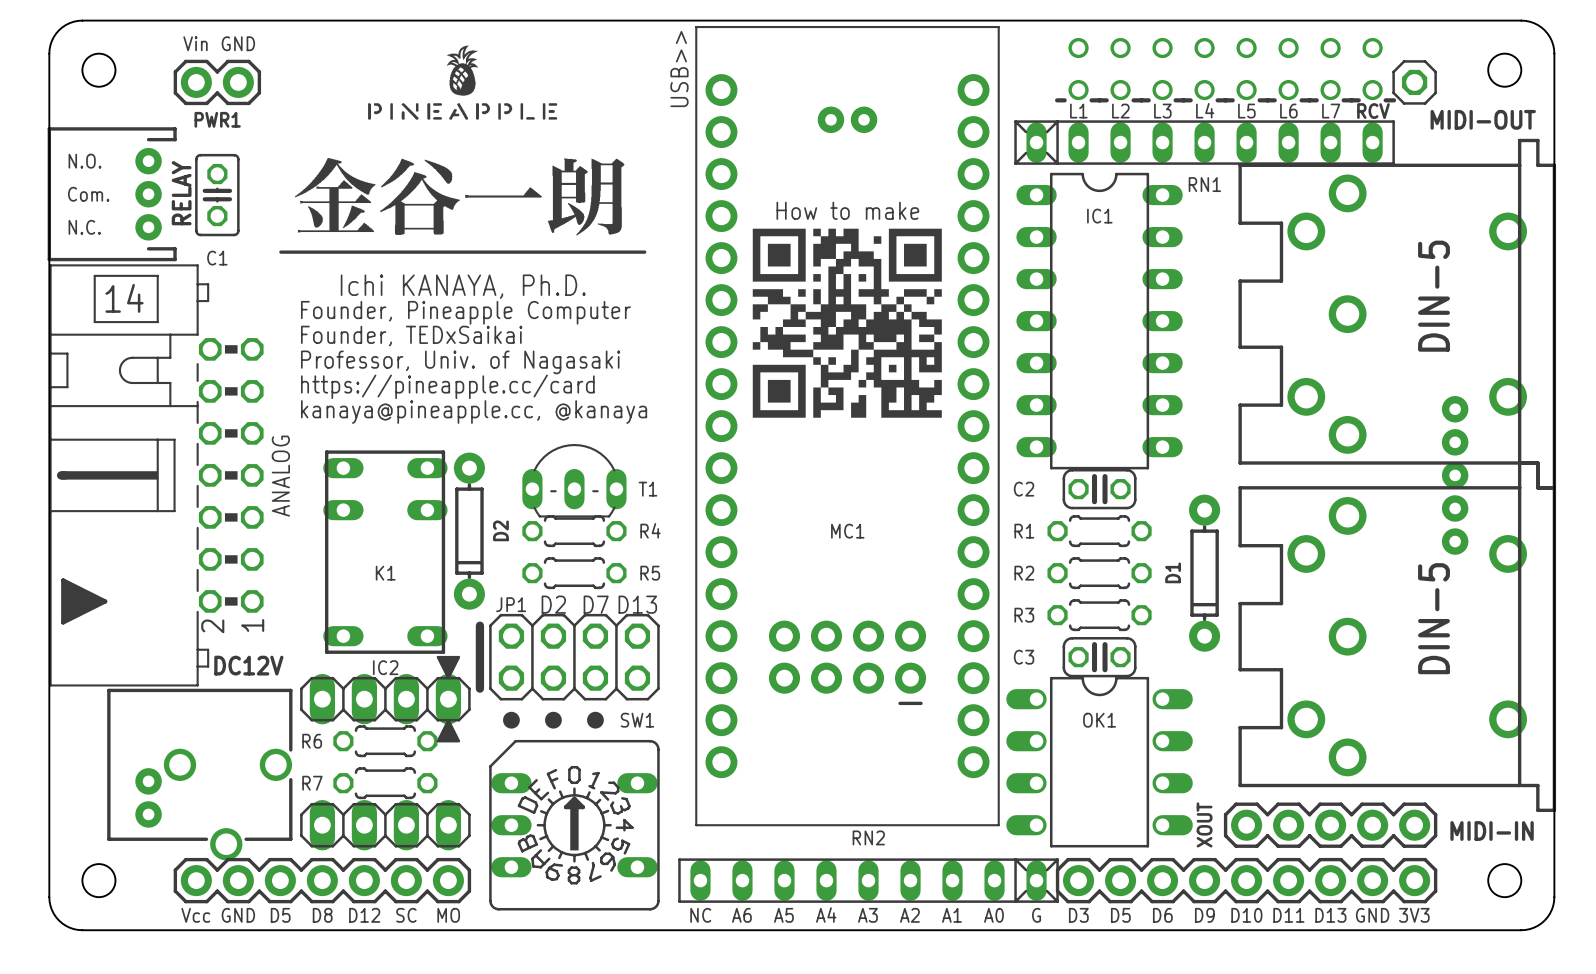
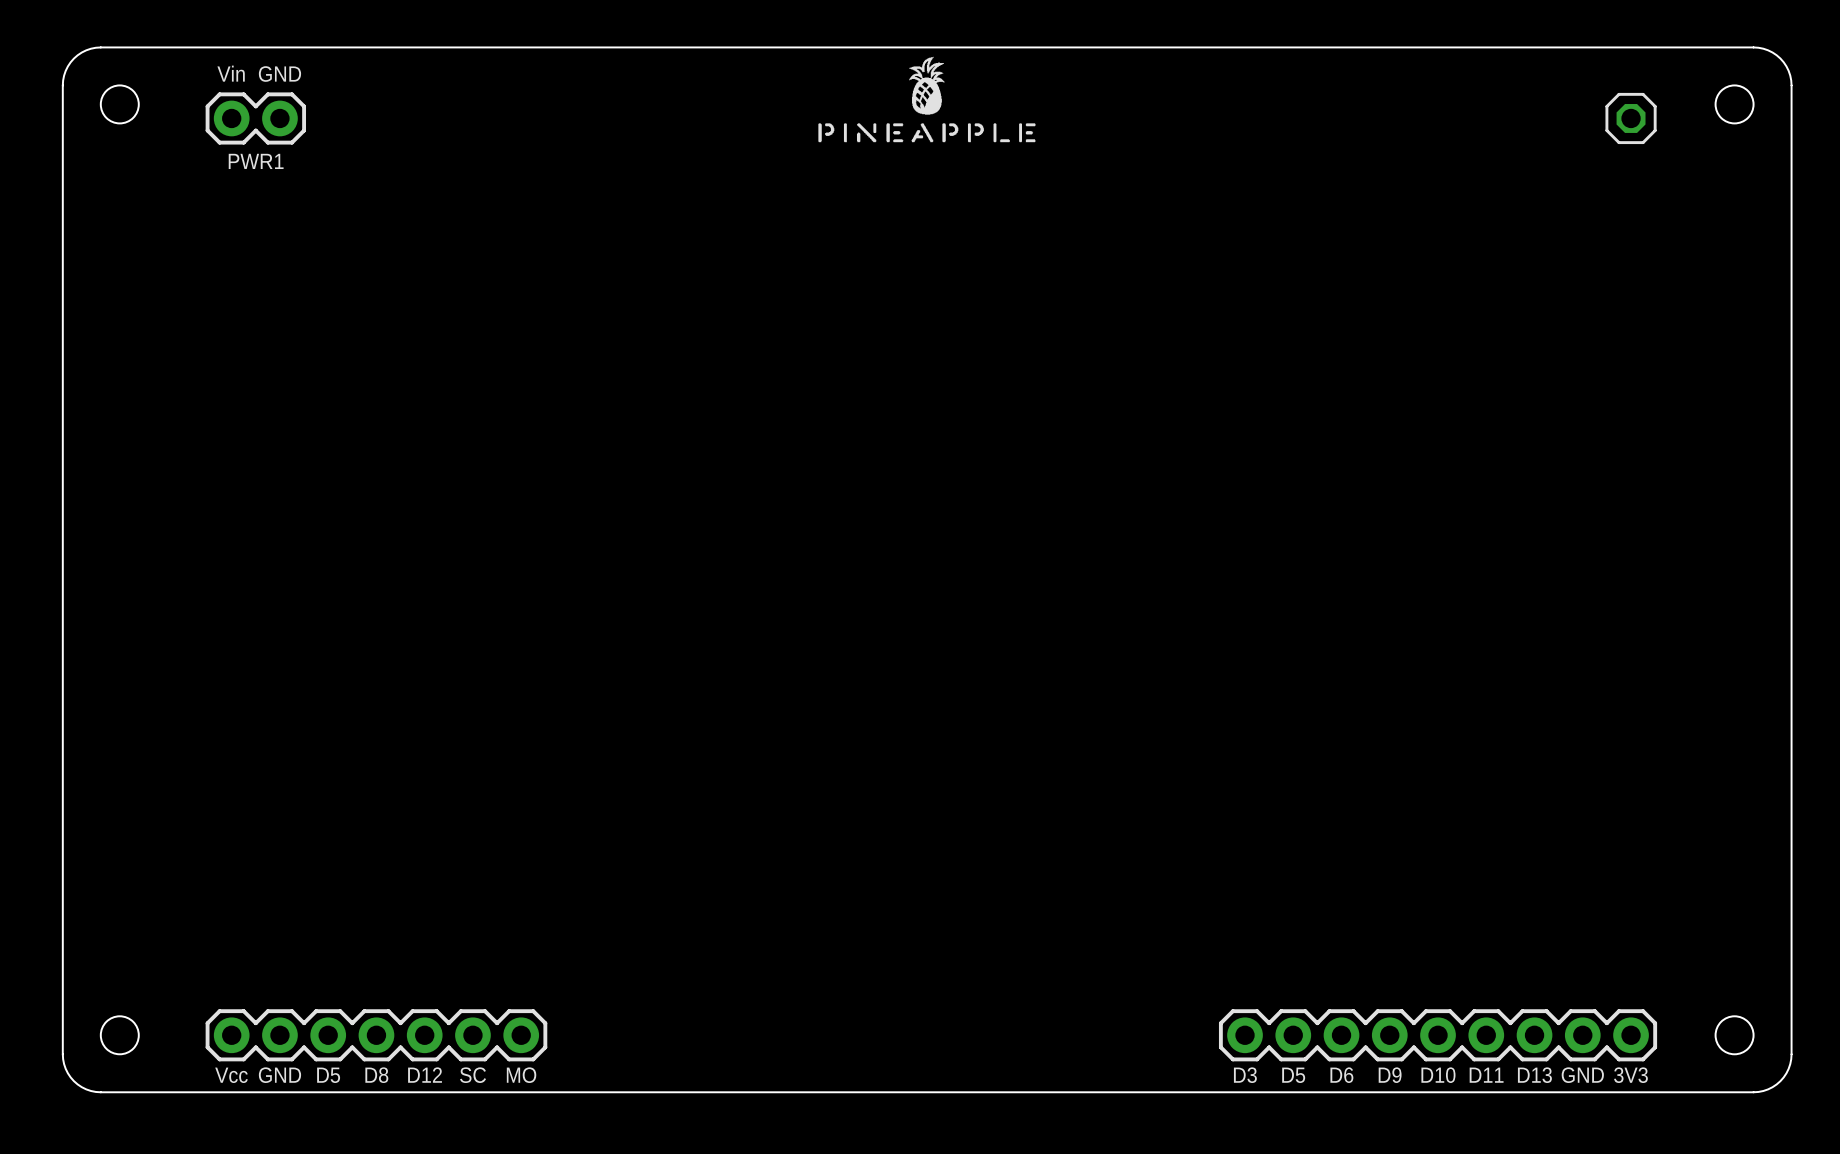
text: USB>> (679, 69) -> none
L1: (1078, 70) -> none
L2: (1120, 70) -> none
L3: (1162, 70) -> none
L4: (1204, 70) -> none
L5: (1246, 70) -> none
L6: (1288, 70) -> none
L7: (1330, 70) -> none
RCV: (1372, 70) -> none
drawing position: (462, 82) -> (926, 99)
part: (847, 119) -> none
RN1: (1204, 142) -> none
drawing: [294, 158, 625, 236] -> none
text: N.O. (84, 161) -> none
text: Com. (88, 194) -> none
RELAY: (112, 194) -> none
C1: (217, 195) -> none
text: How to make (847, 210) -> none
text: N.C. (84, 227) -> none
drawing: [752, 228, 942, 418] -> none
line: (280, 252) (644, 252) -> none
text: Ichi KANAYA, Ph.D. (463, 286) -> none
text: Founder, Pineapple Computer (465, 312) -> none
MIDI-OUT: (1397, 314) -> none
IC1: (1099, 321) -> none
text: Founder, TEDxSaikai (411, 336) -> none
text: Professor, Univ. of Nagasaki (460, 362) -> none
text: https://pineapple.cc/card (447, 386) -> none
text: kanaya@pineapple.cc, @kanaya (474, 412) -> none
part: (847, 426) -> none
ANALOG: (156, 475) -> none
part: (1455, 475) -> none
T1: (574, 480) -> none
C2: (1099, 489) -> none
D2: (469, 531) -> none
R4: (574, 531) -> none
text: MC1 (847, 531) -> none
R1: (1099, 531) -> none
K1: (385, 552) -> none
R5: (574, 573) -> none
R2: (1099, 573) -> none
D1: (1204, 573) -> none
text: D2 (553, 604) -> none
text: D7 (596, 604) -> none
text: D13 (637, 604) -> none
R3: (1099, 615) -> none
line: (479, 625) (479, 688) -> none
MIDI-IN: (1397, 636) -> none
drawing: [436, 655, 461, 680] -> none
JP1: (574, 657) -> none
C3: (1099, 657) -> none
part: (847, 662) -> none
text: IC2 (385, 667) -> none
part: (385, 699) -> none
drawing: [503, 711, 520, 729] -> none
drawing: [545, 711, 562, 729] -> none
drawing: [587, 711, 604, 729] -> none
drawing: [436, 718, 461, 743] -> none
R6: (385, 741) -> none
OK1: (1099, 762) -> none
DC12V: (199, 774) -> none
R7: (385, 783) -> none
part: (148, 797) -> none
part: (385, 825) -> none
SW1: (574, 825) -> none
XOUT: (1330, 825) -> none
RN2: (868, 880) -> none
text: NC (700, 915) -> none
text: A6 (741, 915) -> none
text: A5 (783, 915) -> none
text: A4 (826, 915) -> none
text: A3 (867, 915) -> none
text: A2 (909, 915) -> none
text: A1 (951, 915) -> none
text: A0 (993, 915) -> none
text: G (1036, 915) -> none

